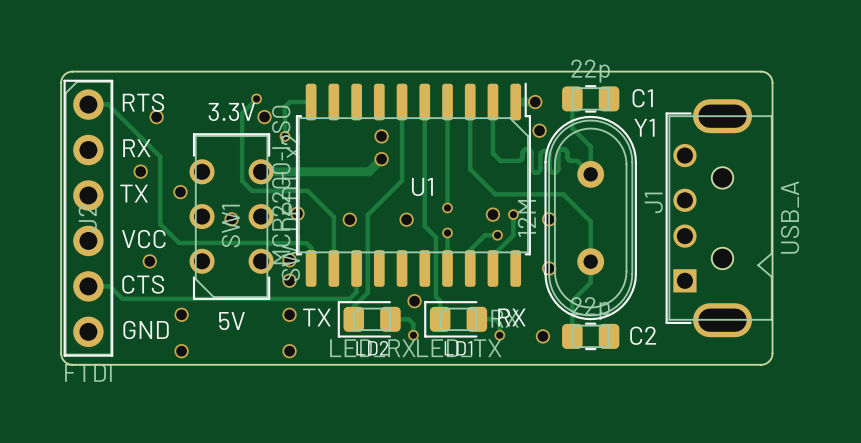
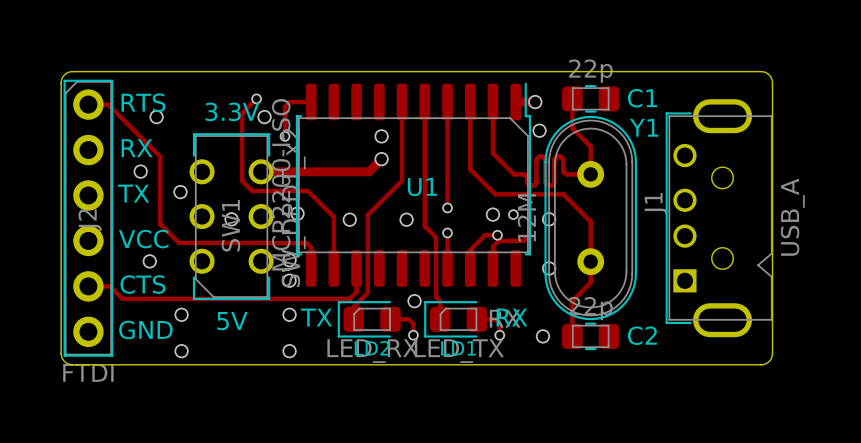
track: (500, 160) (520, 160) (523, 150) (528, 149) (531, 152) (532, 170) (537, 172) (540, 169) (540, 153) (545, 150) (549, 154) (549, 170) (554, 172) (558, 169) (558, 151) (563, 149) (566, 151) (569, 159) (577, 160) (590, 174) -> (500, 160) (513, 174) (525, 175) (527, 183) (530, 185) (536, 182) (536, 159) (539, 156) (545, 159) (545, 182) (548, 185) (554, 182) (554, 159) (557, 156) (562, 159) (563, 170) (565, 173) (590, 174)
track: (513, 214) (513, 235) (492, 255) -> (529, 210) (529, 235) (523, 240) (498, 240) (492, 246) (492, 255)

